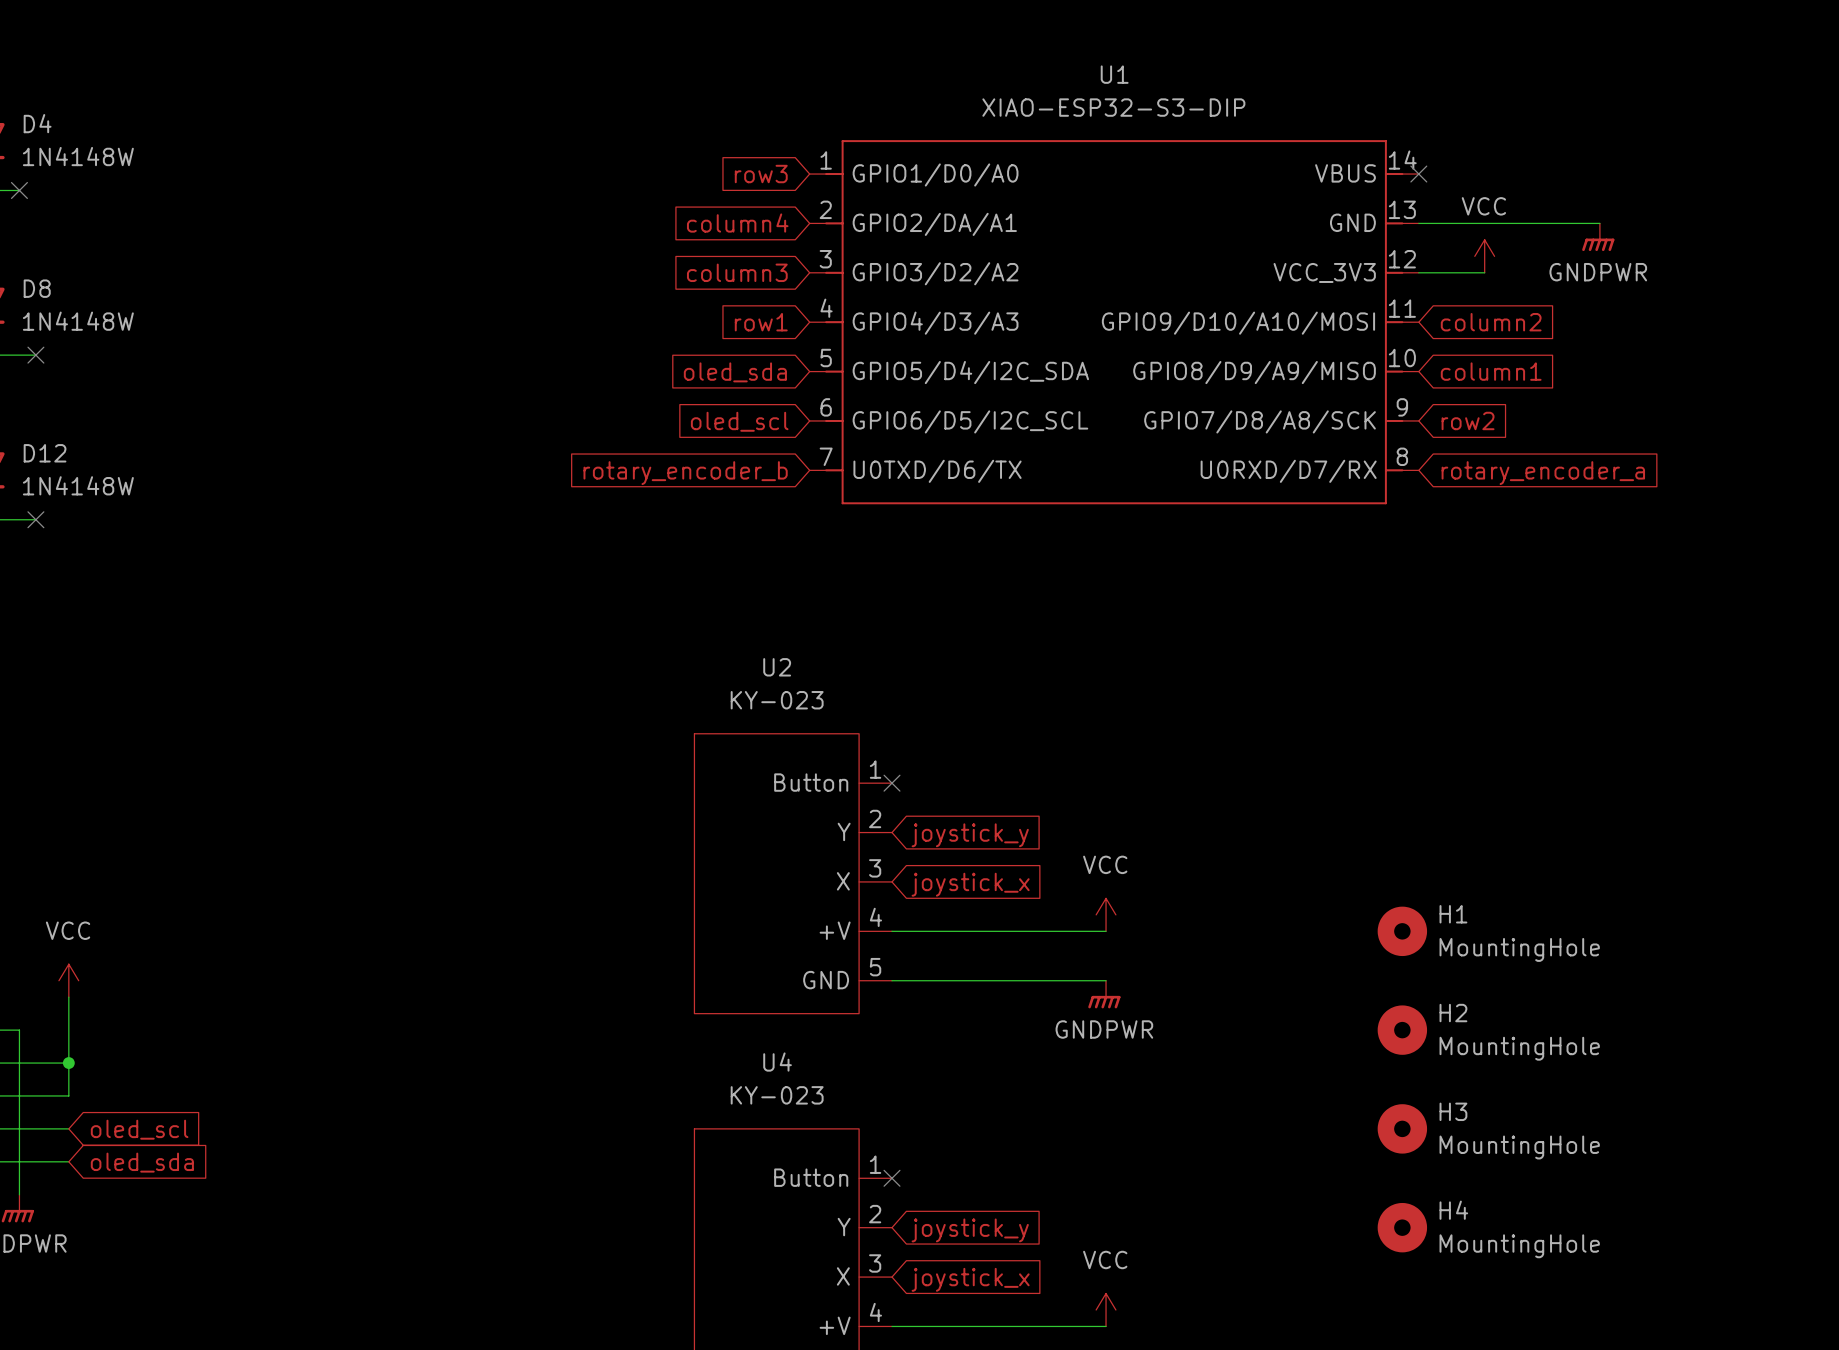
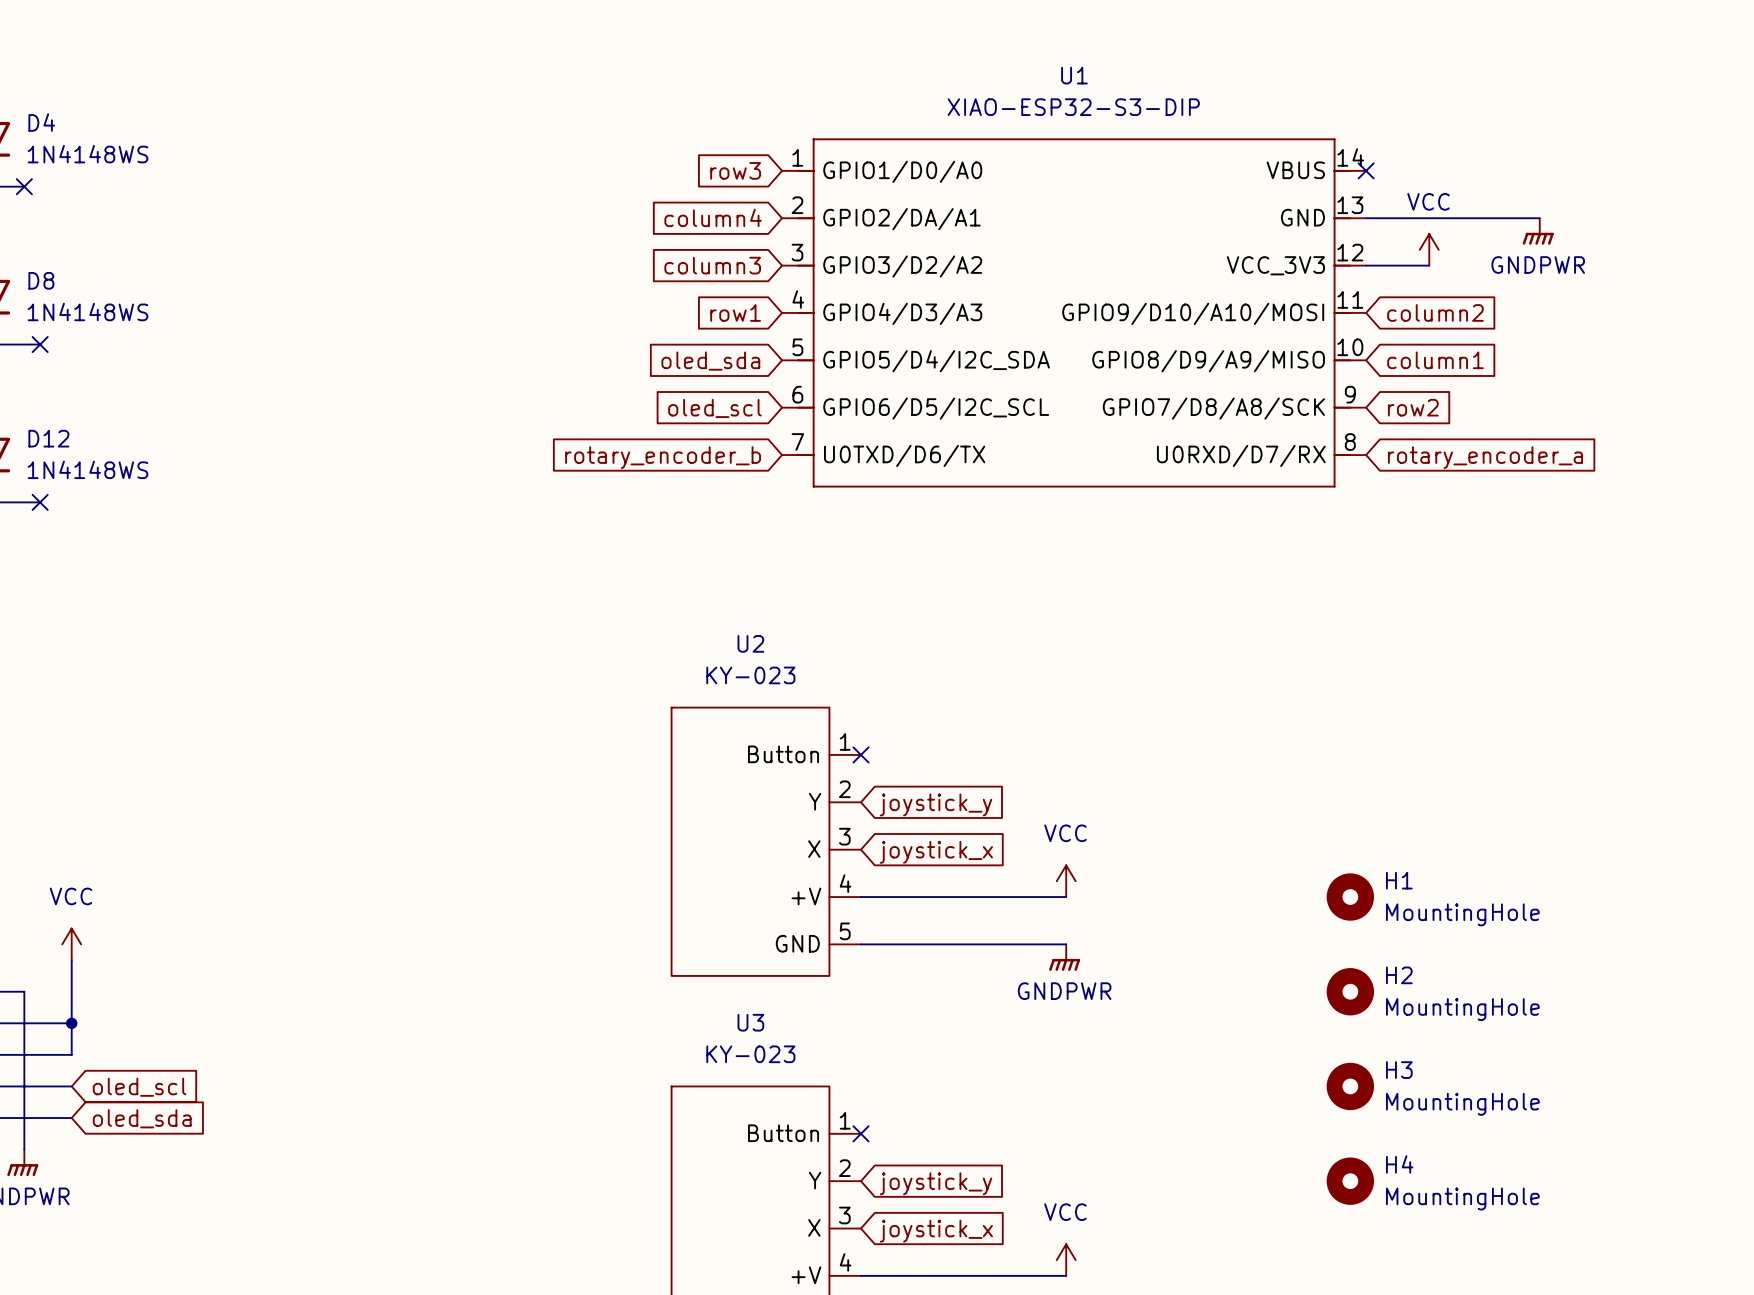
D4 value: 1N4148W (78, 156) -> 1N4148WS (87, 154)
D8 value: 1N4148W (78, 321) -> 1N4148WS (87, 312)
D12 value: 1N4148W (78, 485) -> 1N4148WS (87, 469)
U4 name: U4 (777, 1062) -> U3 (750, 1022)

